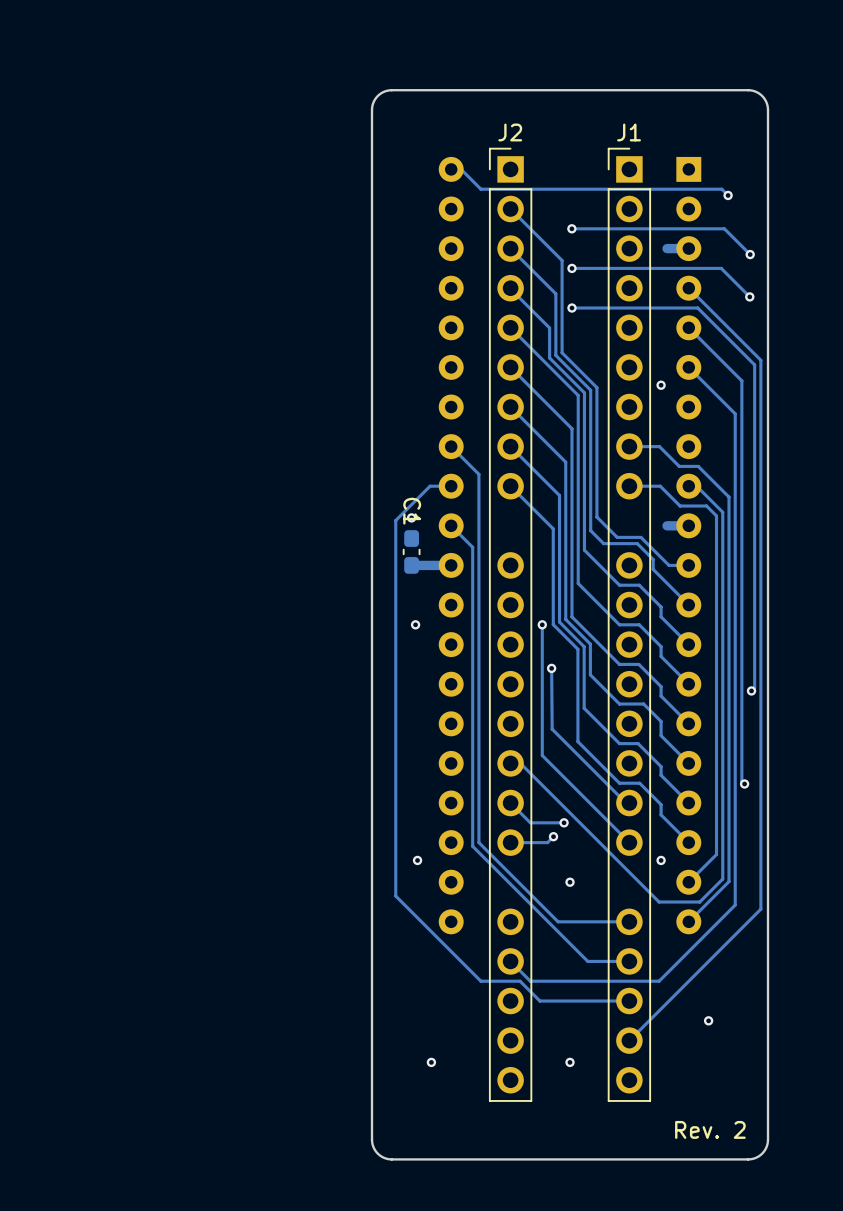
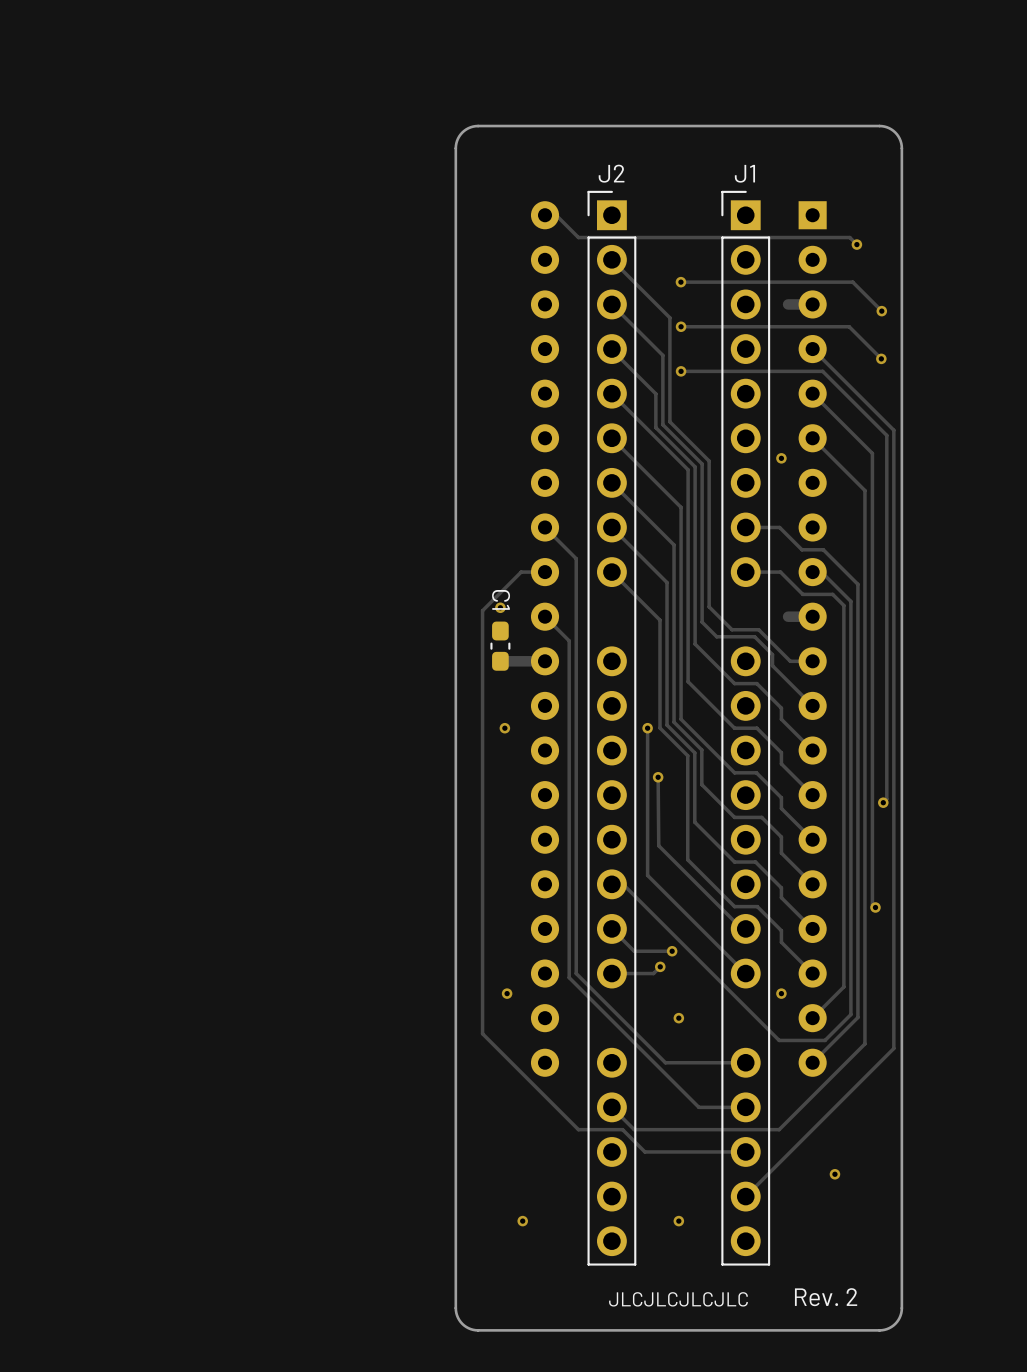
text: none -> JLCJLCJLCJLC (678, 1299)

